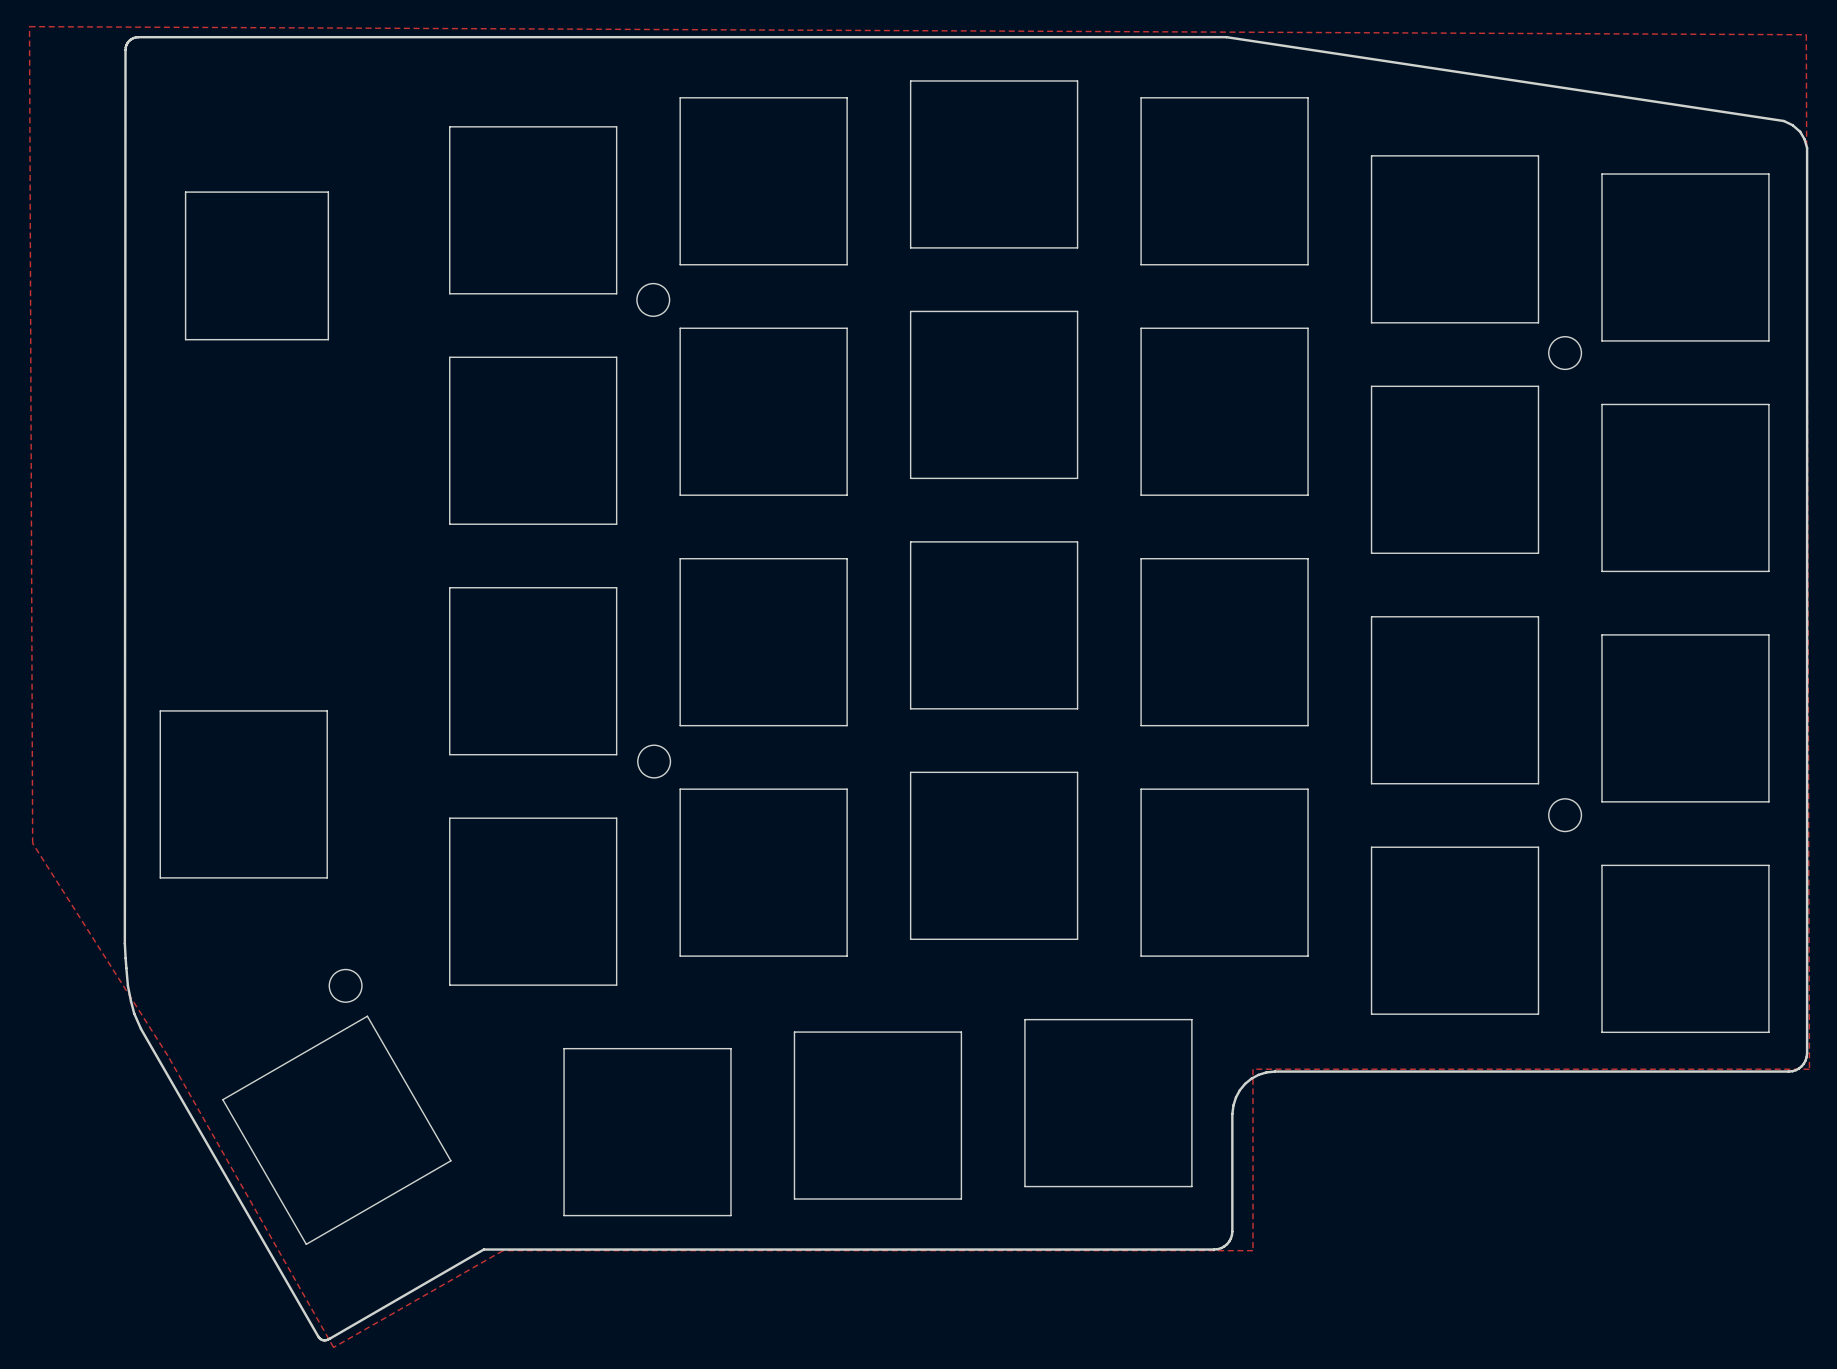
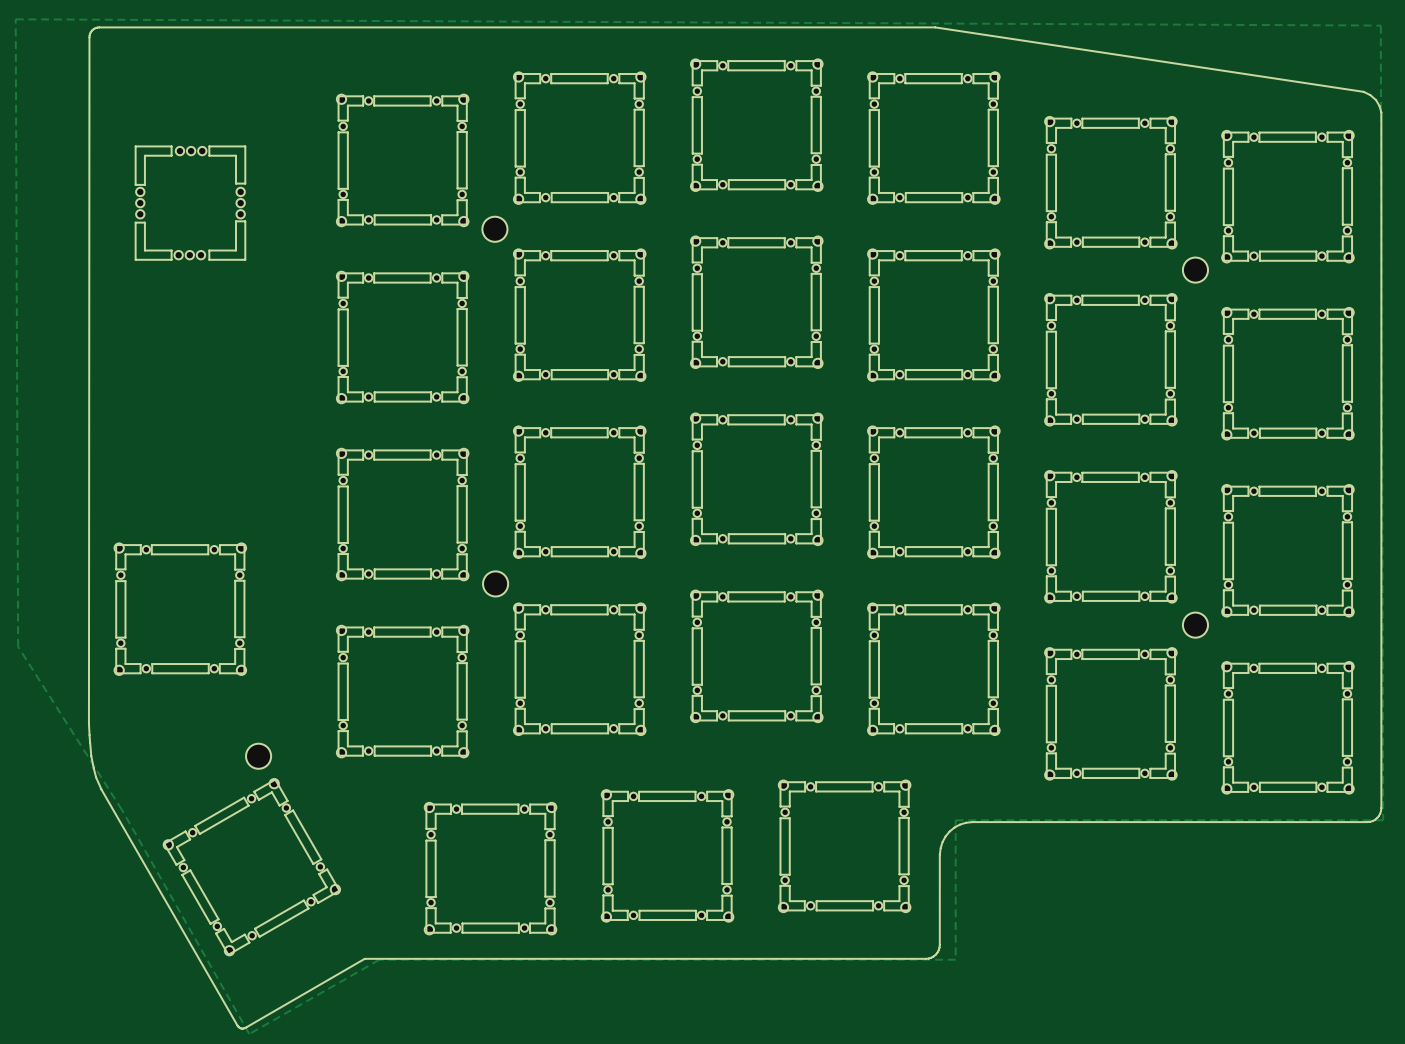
drawing: [910, 80, 1079, 249] -> none
drawing: [679, 97, 848, 266] -> none
drawing: [1140, 97, 1309, 266] -> none
drawing: [449, 126, 618, 295] -> none
drawing: [1370, 155, 1540, 324] -> none
part: none -> (756, 125)
drawing: [1601, 173, 1770, 342] -> none
part: none -> (579, 138)
part: none -> (933, 138)
drawing: [184, 191, 330, 341] -> none
part: none -> (402, 160)
part: none -> (1110, 182)
part: none -> (1287, 196)
part: none -> (190, 203)
drawing: [910, 310, 1079, 479] -> none
drawing: [679, 327, 848, 496] -> none
drawing: [1140, 327, 1309, 496] -> none
drawing: [449, 356, 618, 525] -> none
drawing: [1370, 385, 1540, 554] -> none
part: none -> (756, 302)
drawing: [1601, 403, 1770, 573] -> none
part: none -> (579, 315)
part: none -> (933, 315)
part: none -> (402, 337)
part: none -> (1110, 359)
part: none -> (1287, 373)
drawing: [910, 541, 1079, 710] -> none
drawing: [679, 558, 848, 727] -> none
drawing: [1140, 558, 1309, 727] -> none
drawing: [449, 587, 618, 756] -> none
drawing: [1370, 616, 1540, 785] -> none
part: none -> (756, 479)
drawing: [1601, 634, 1770, 803] -> none
part: none -> (579, 492)
part: none -> (933, 492)
part: none -> (402, 514)
part: none -> (1110, 536)
drawing: [159, 710, 328, 879] -> none
part: none -> (1287, 550)
drawing: [910, 771, 1079, 940] -> none
drawing: [679, 788, 848, 957] -> none
drawing: [1140, 788, 1309, 957] -> none
part: none -> (180, 609)
drawing: [449, 817, 618, 986] -> none
drawing: [1370, 846, 1540, 1015] -> none
part: none -> (756, 656)
drawing: [1601, 864, 1770, 1033] -> none
part: none -> (579, 669)
part: none -> (933, 669)
part: none -> (402, 691)
part: none -> (1110, 713)
part: none -> (1287, 727)
drawing: [222, 1015, 452, 1245] -> none
drawing: [1024, 1019, 1193, 1188] -> none
drawing: [793, 1031, 963, 1200] -> none
drawing: [563, 1048, 732, 1217] -> none
part: none -> (844, 846)
part: none -> (667, 855)
part: none -> (251, 867)
part: none -> (490, 868)

